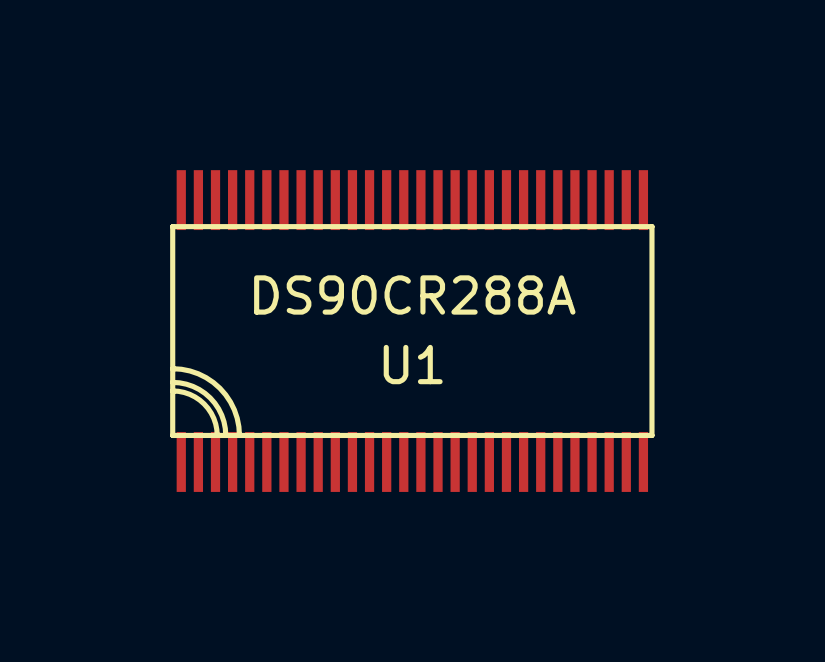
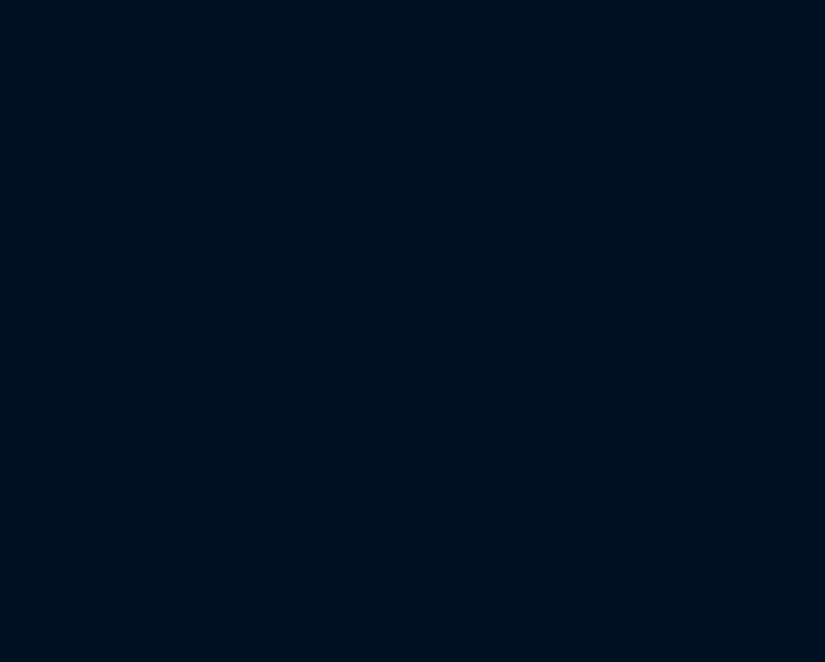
U1: DS90CR288A (412, 331) -> none

